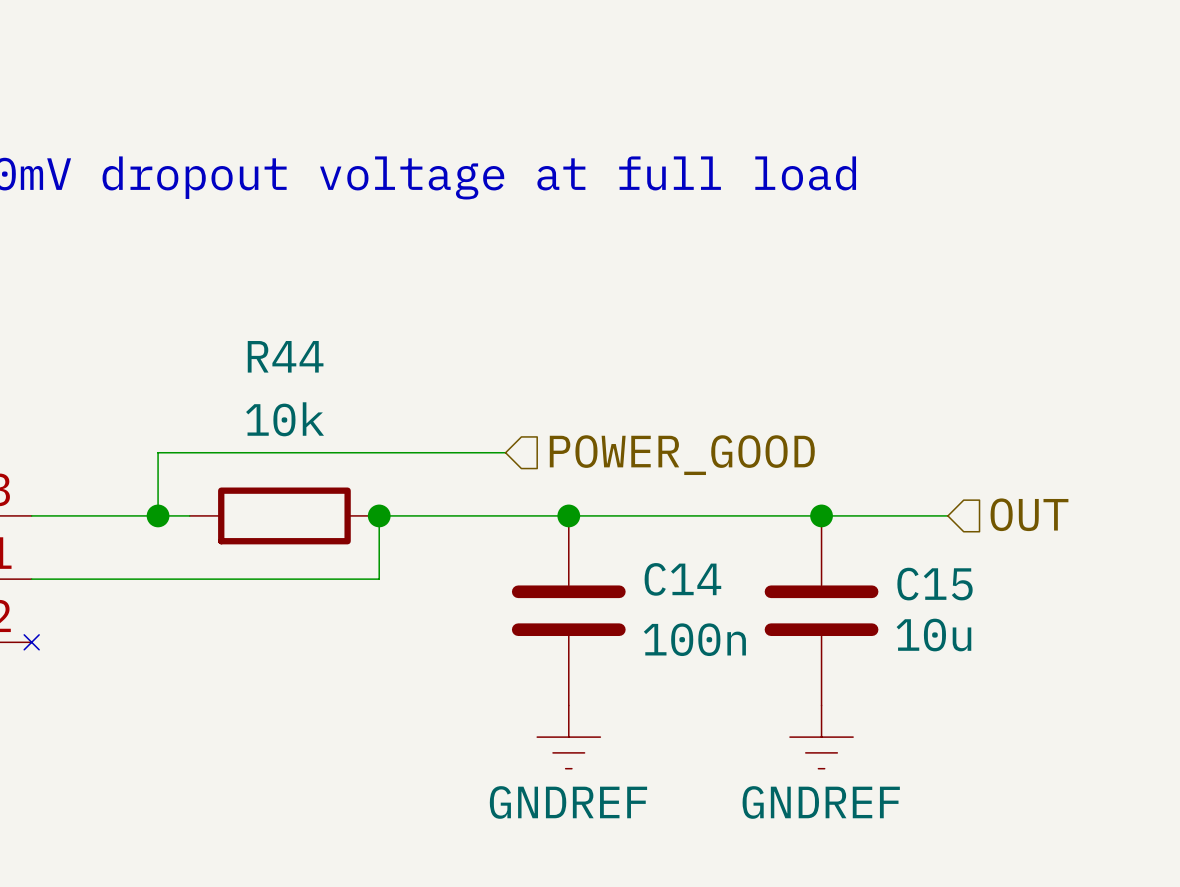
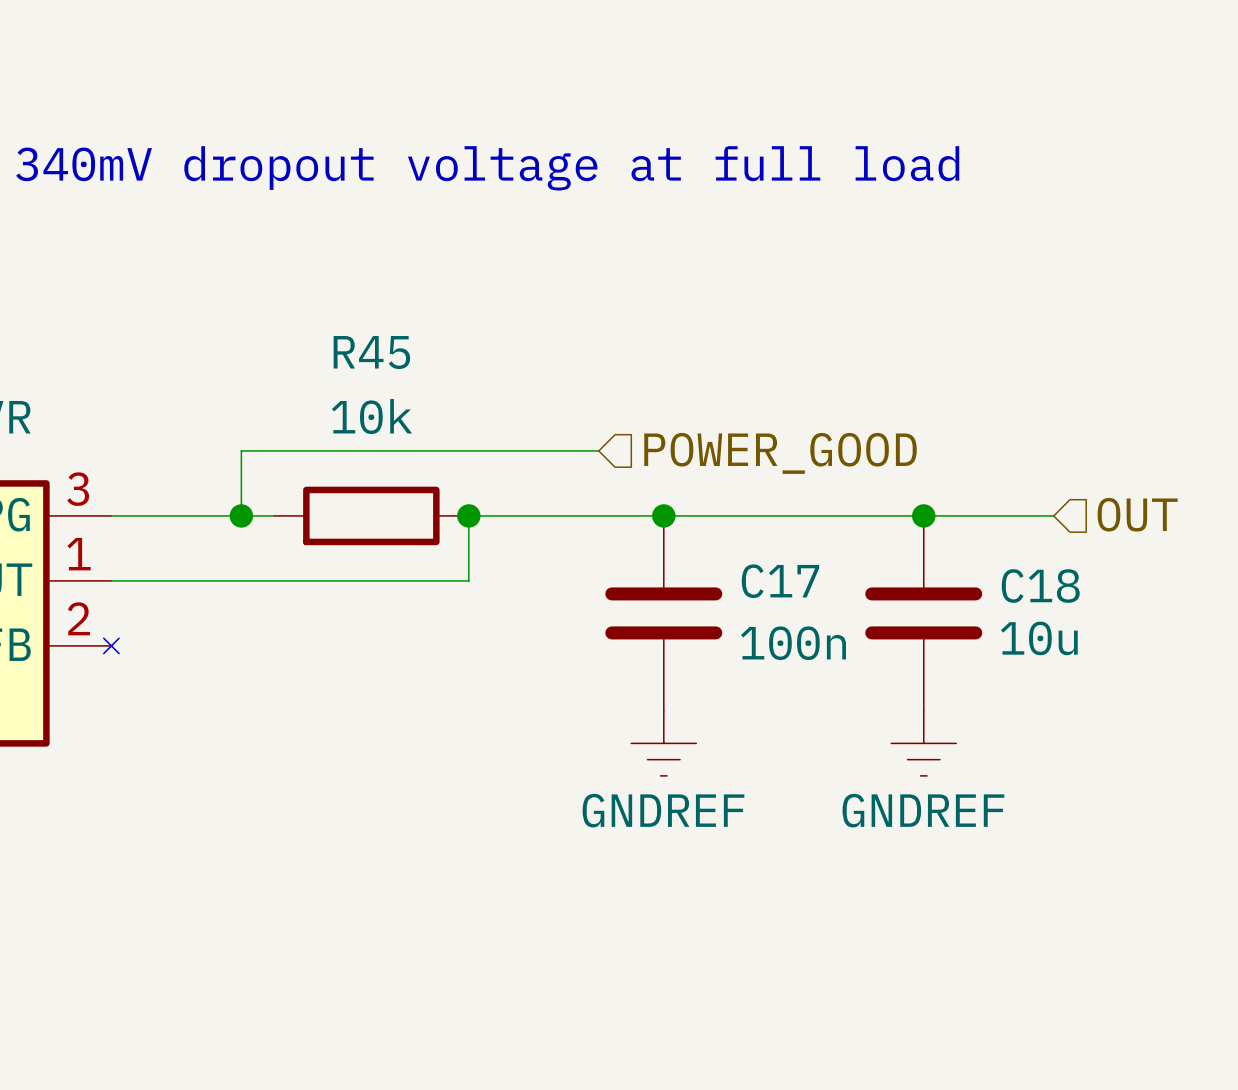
R44 name: R44 (285, 356) -> R45 (371, 352)
C14 name: C14 (682, 579) -> C17 (780, 581)
C15 name: C15 (935, 584) -> C18 (1040, 586)

